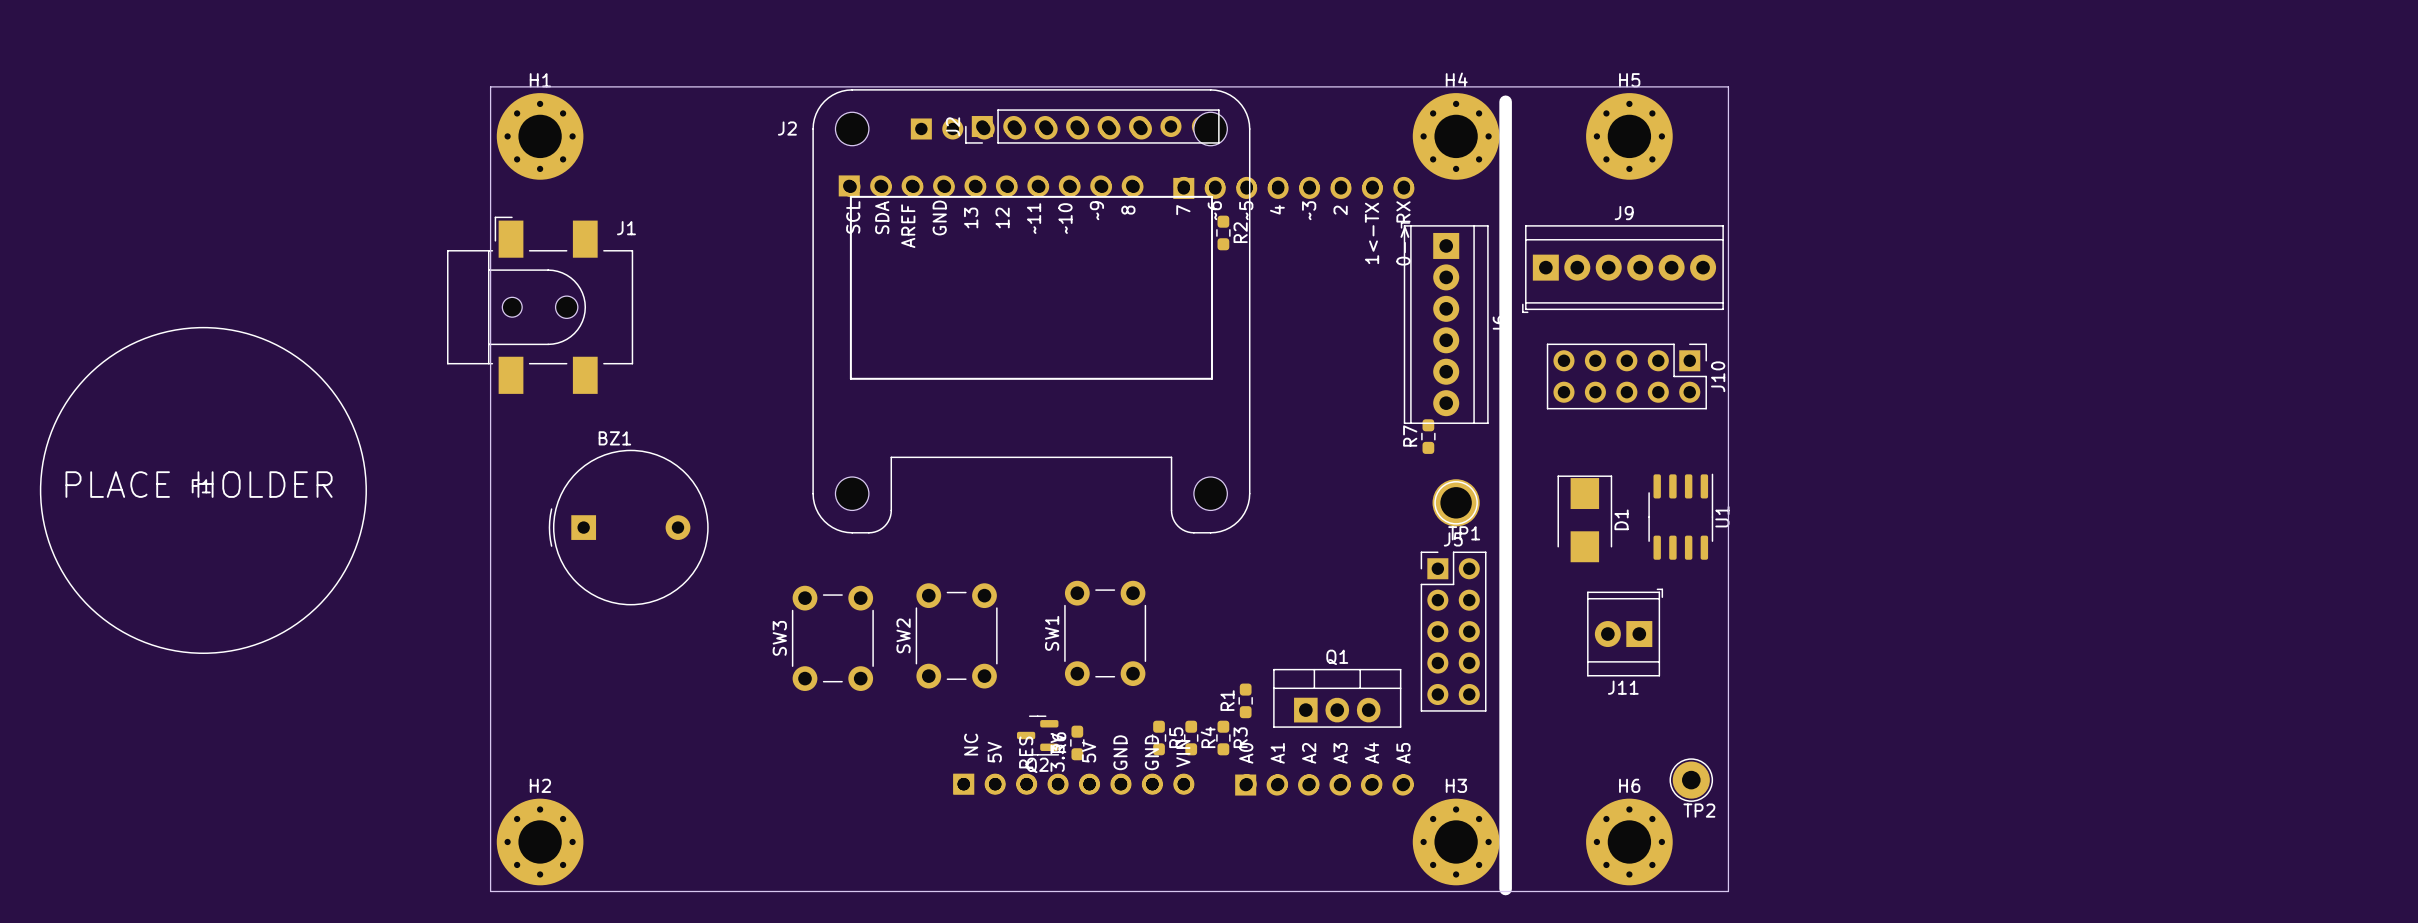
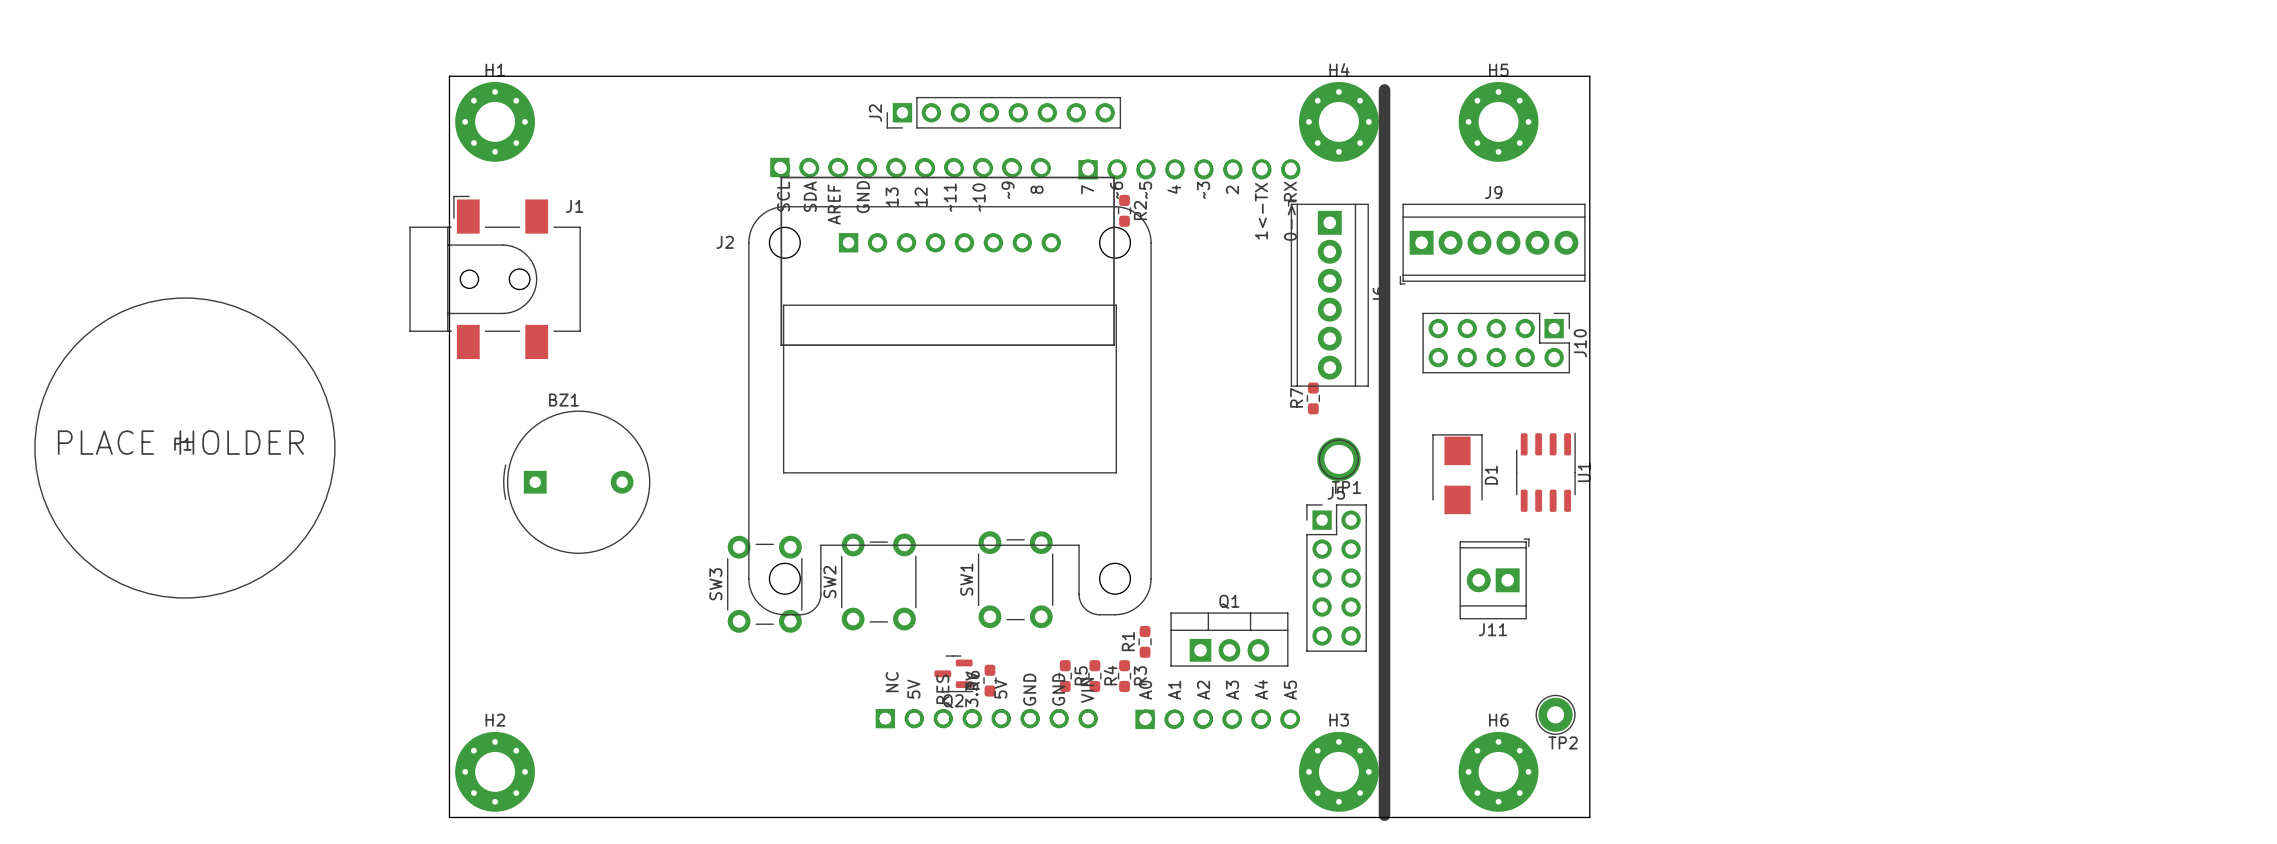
J2 position: (1031, 311) -> (949, 410)

